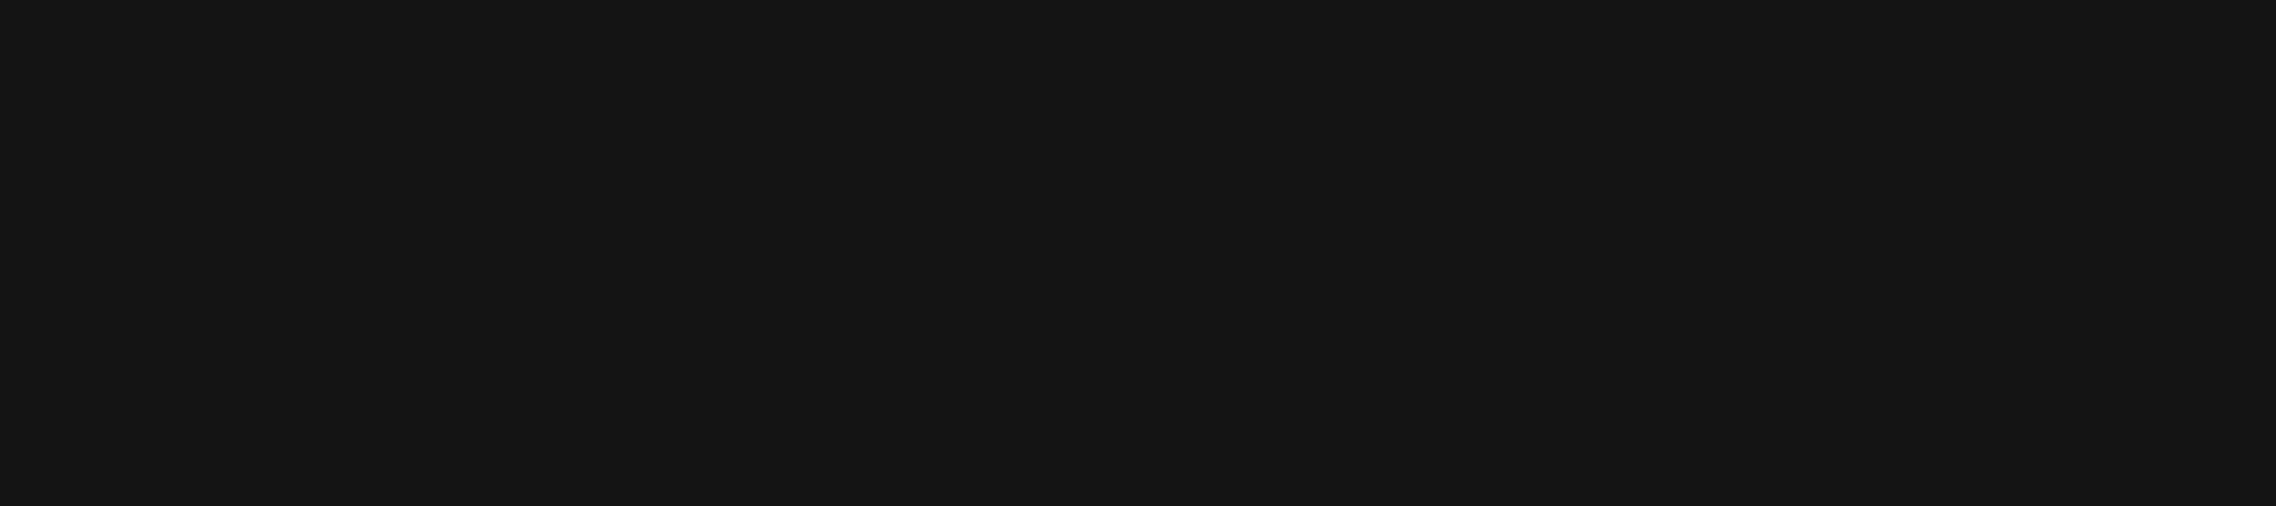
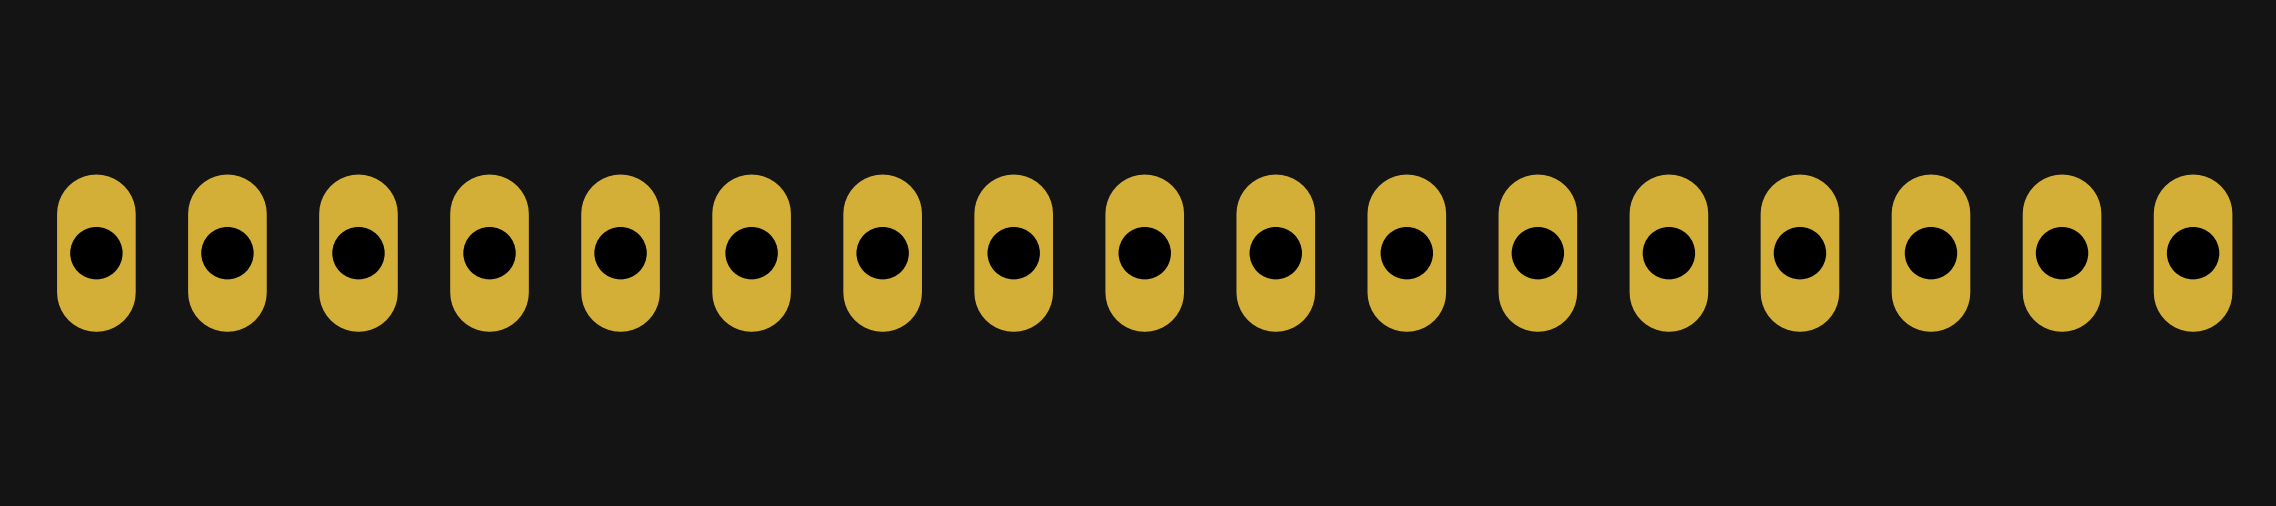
part: none -> (1144, 253)

